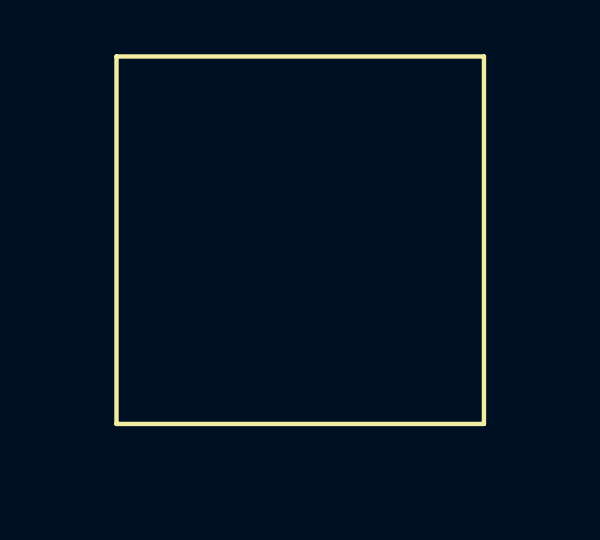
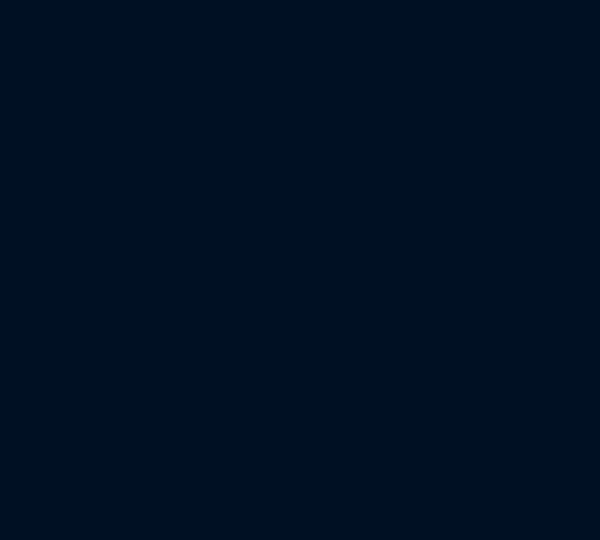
line: (116, 56) (483, 56) (483, 423) (116, 423) (116, 56) -> none

